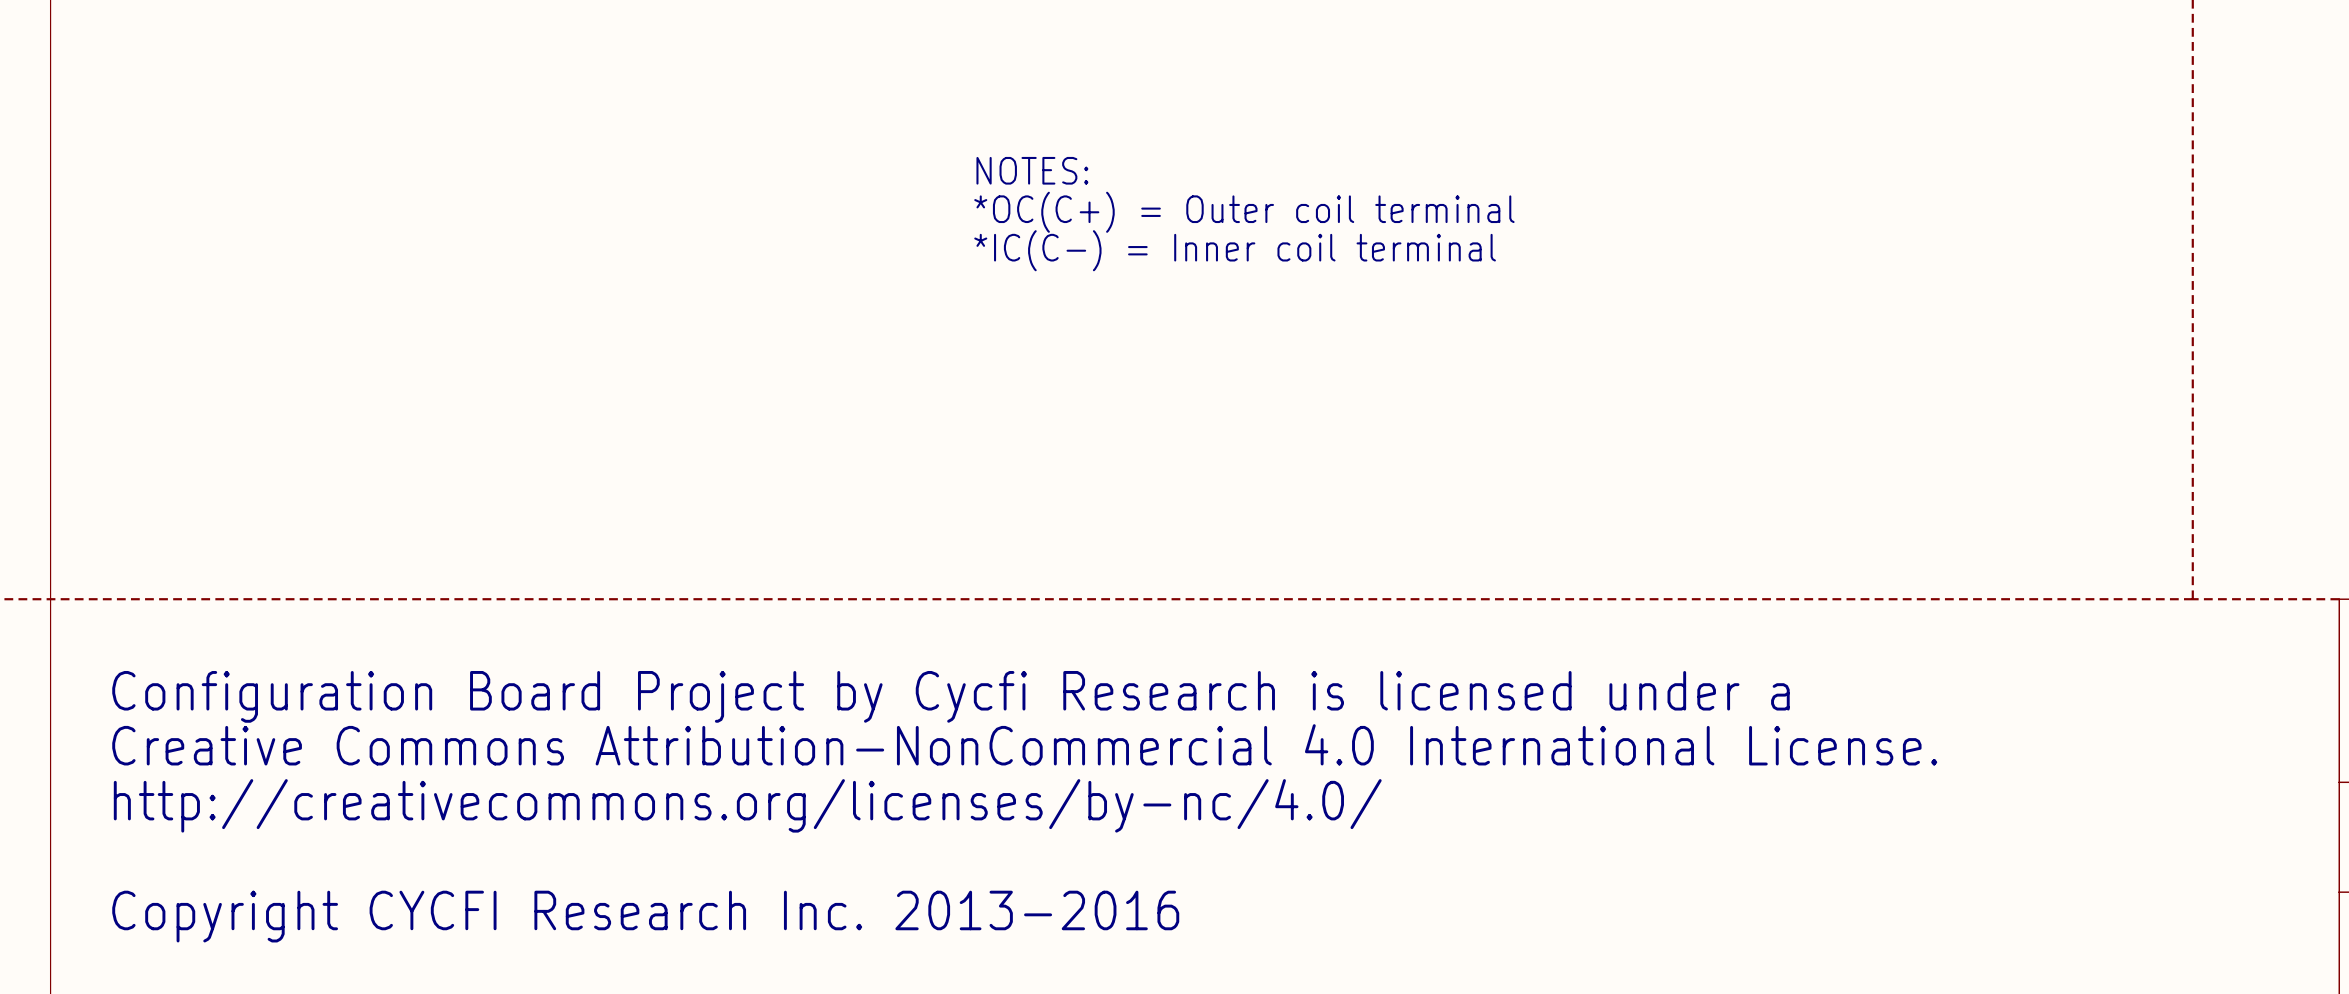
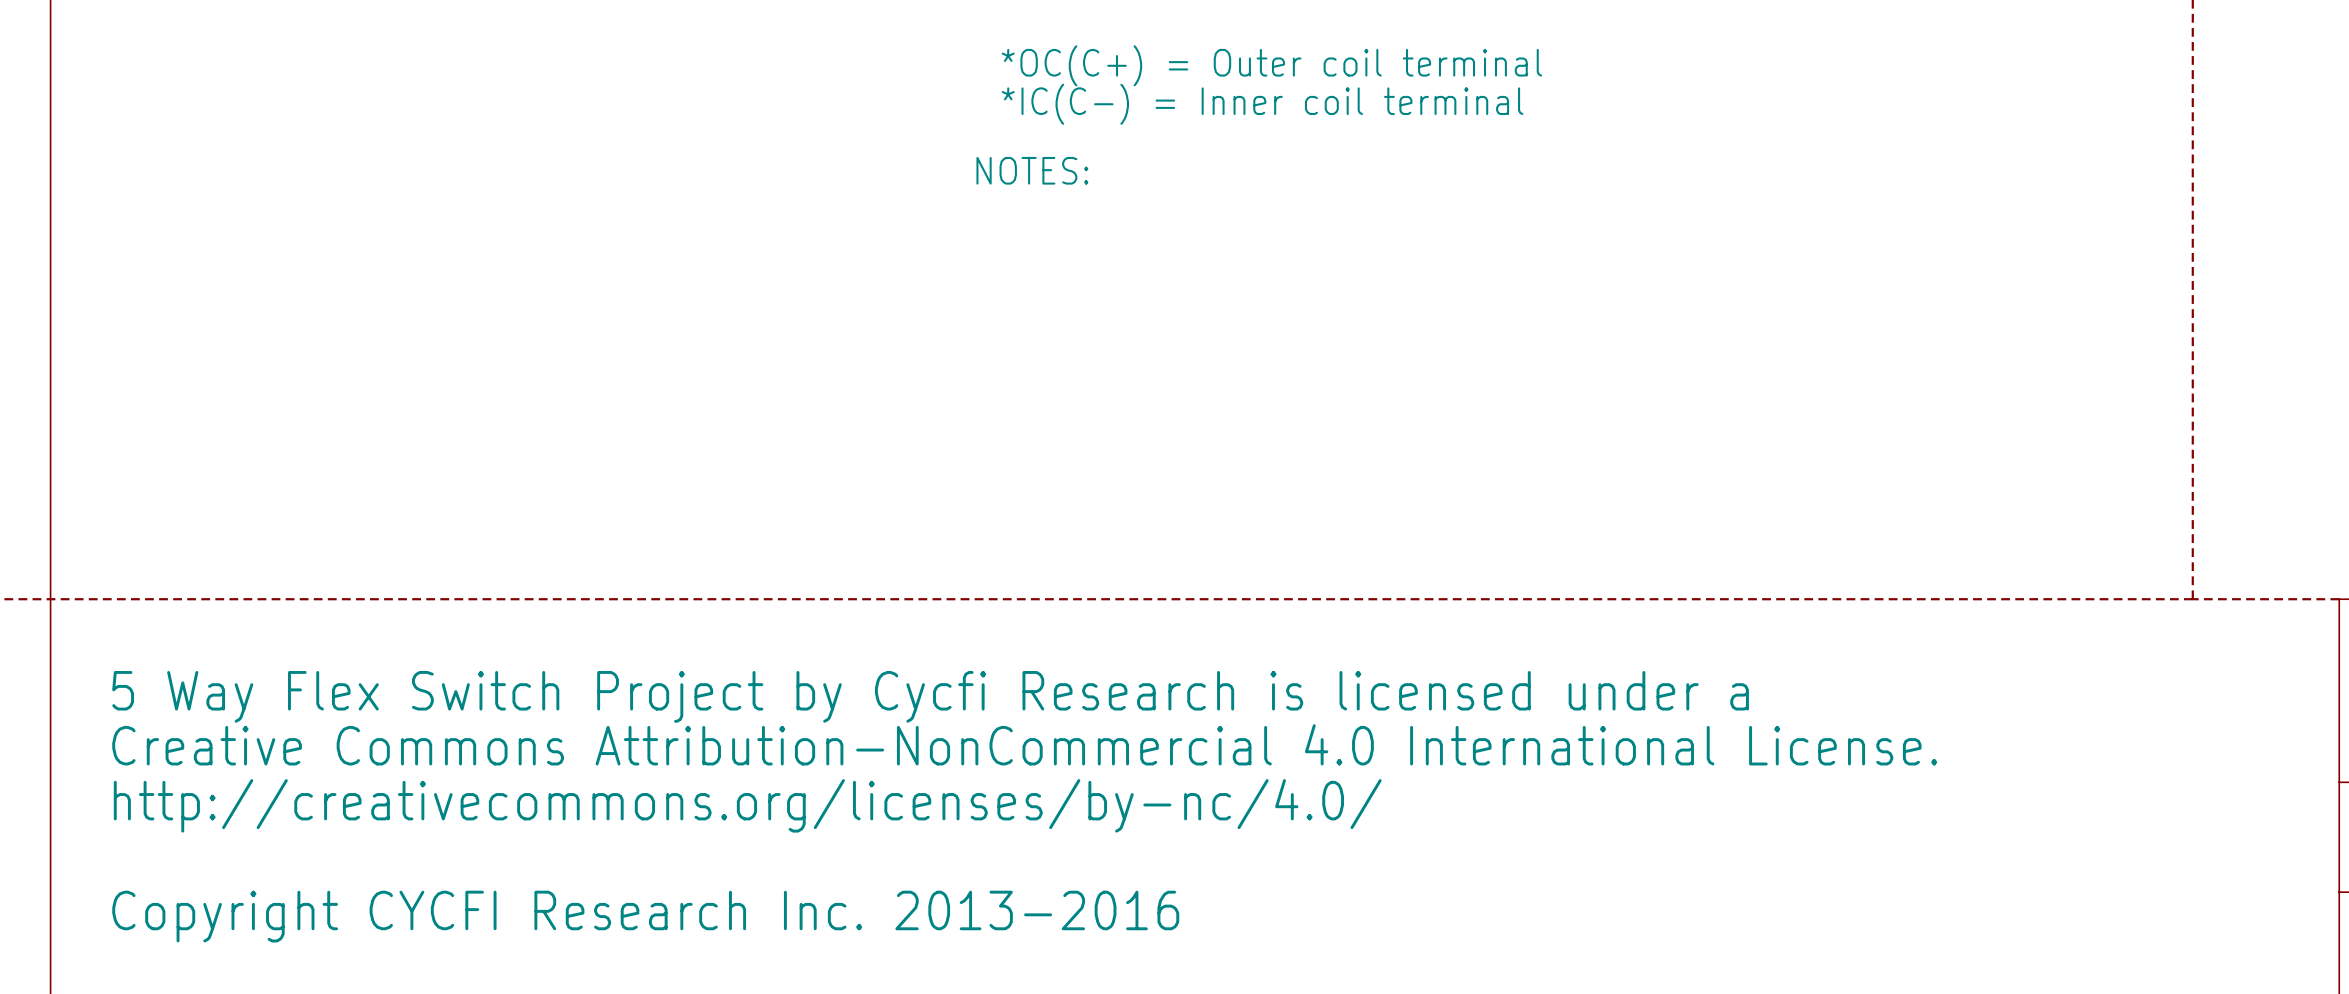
text position: *OC(C+) = Outer coil terminal (1244, 212) -> *OC(C+) = Outer coil terminal (1271, 65)
text position: *IC(C-) = Inner coil terminal (1235, 250) -> *IC(C-) = Inner coil terminal (1262, 104)
text: Configuration Board Project by Cycfi Research is licensed under a (950, 696) -> 5 Way Flex Switch Project by Cycfi Research is licensed under a (930, 696)

